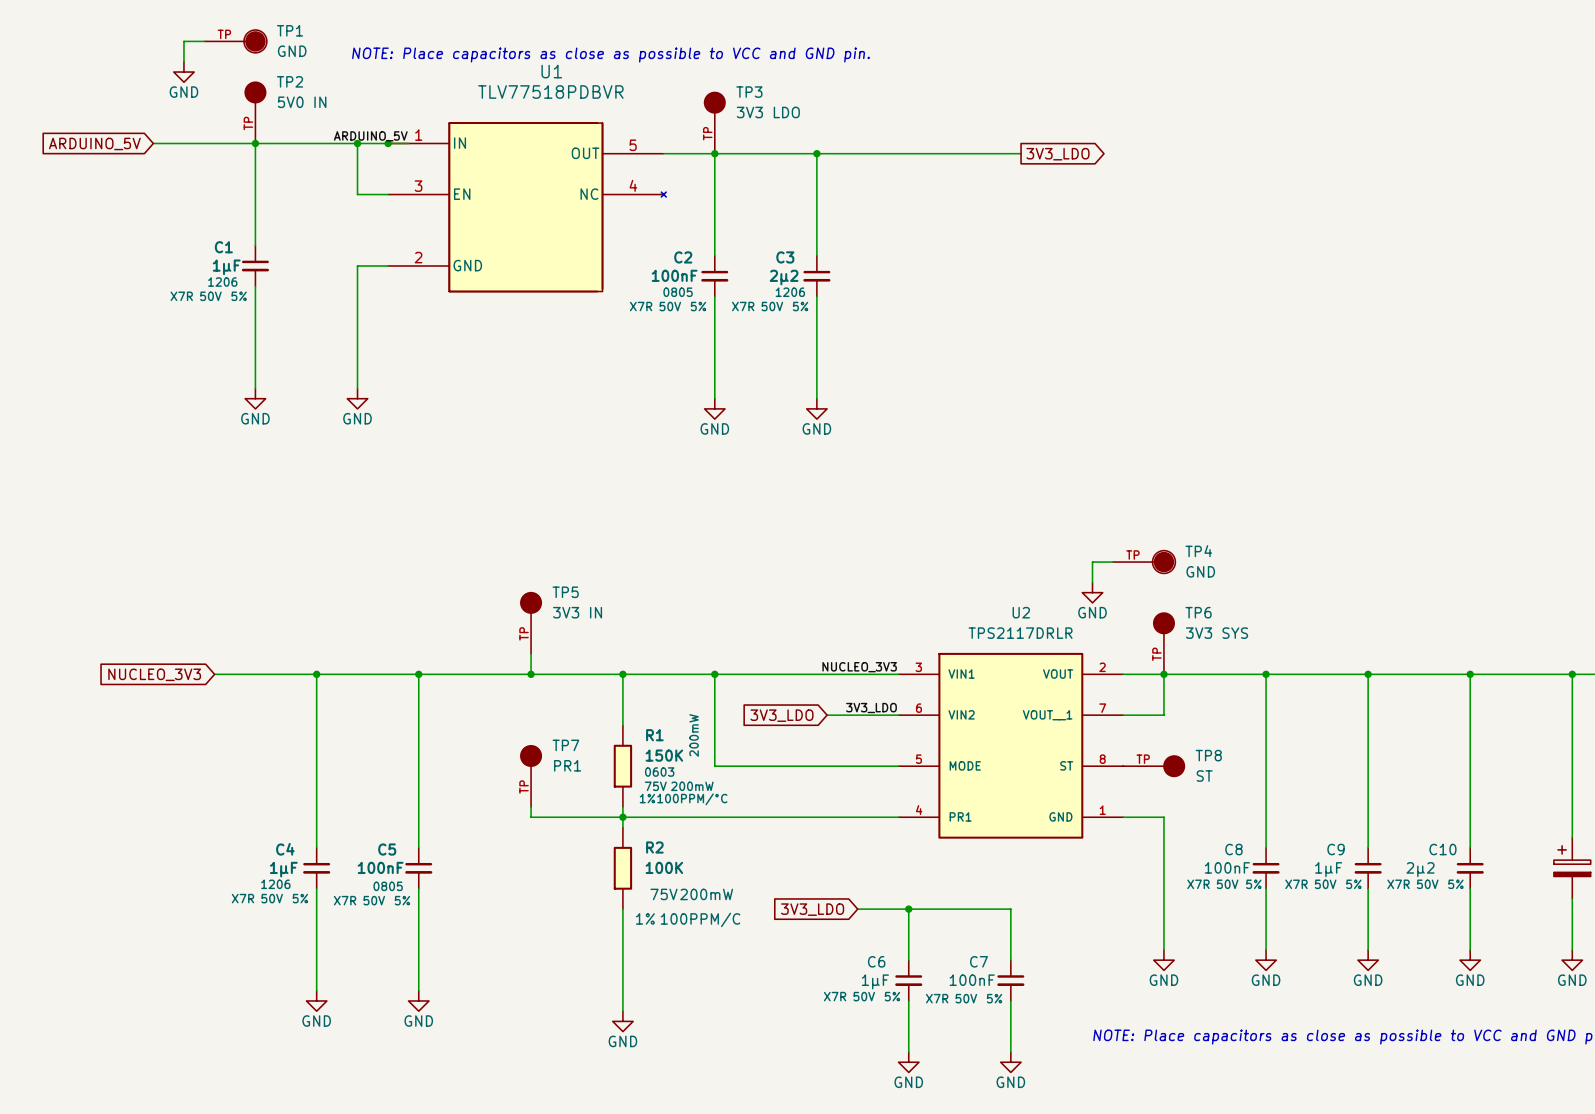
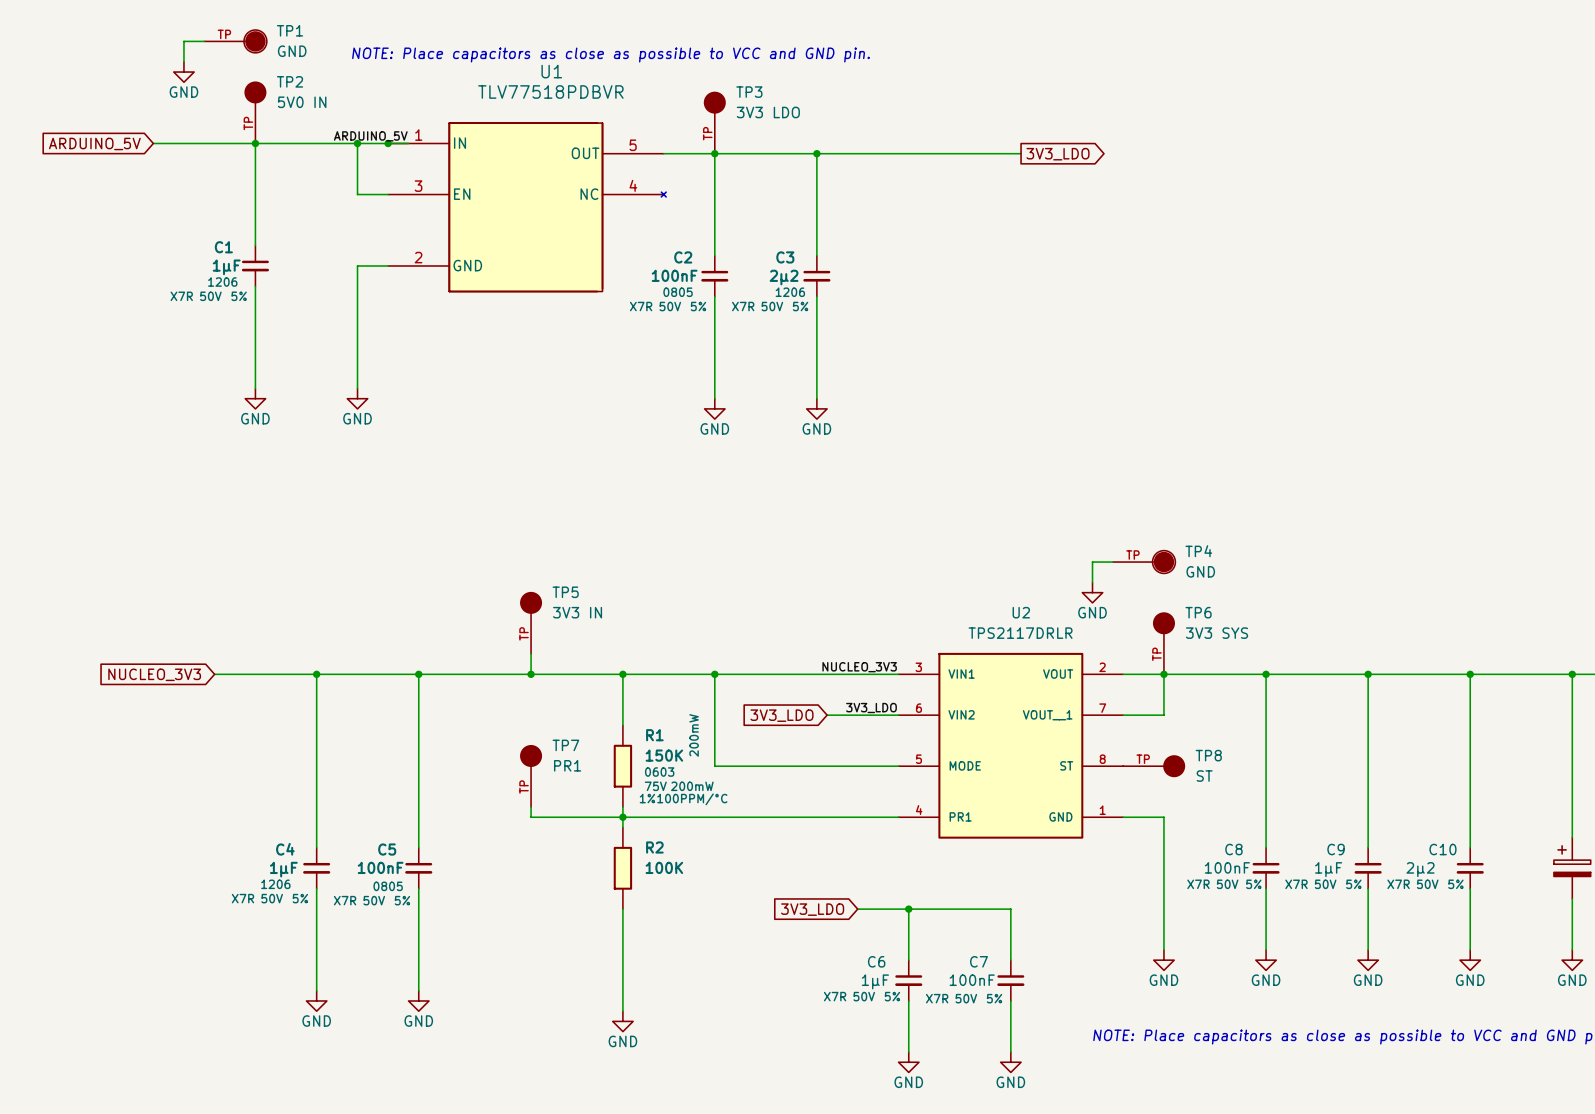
R2 text: 75V (664, 894) -> none
R2 text: 200mW (706, 894) -> none
R2 text: 1% (645, 918) -> none
R2 text: 100PPM/C (700, 919) -> none

